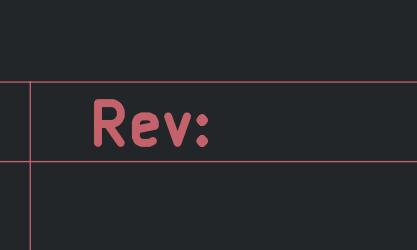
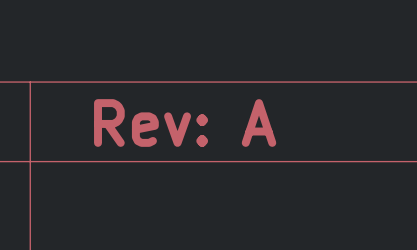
title block: Rev: (151, 122) -> Rev: A (185, 122)

